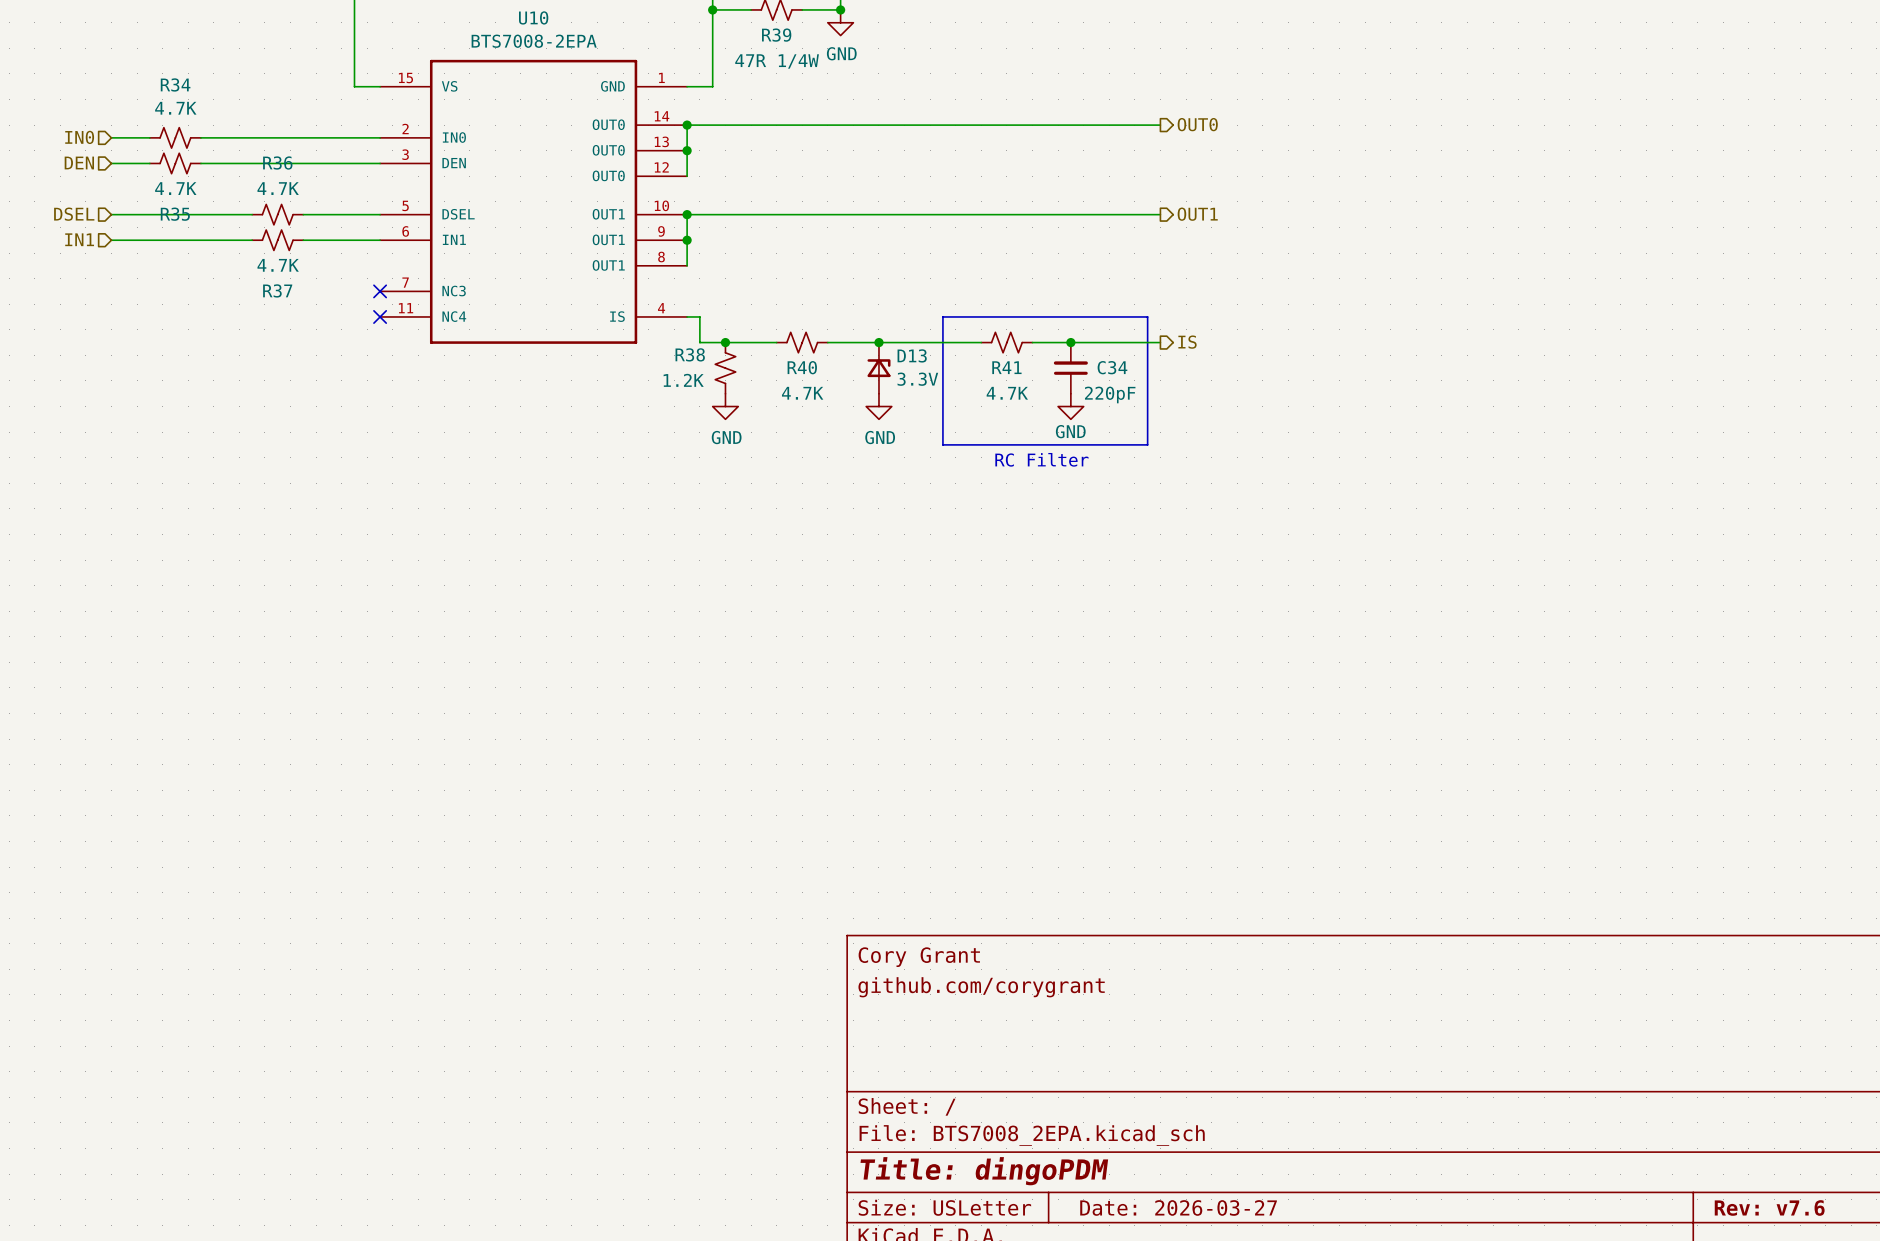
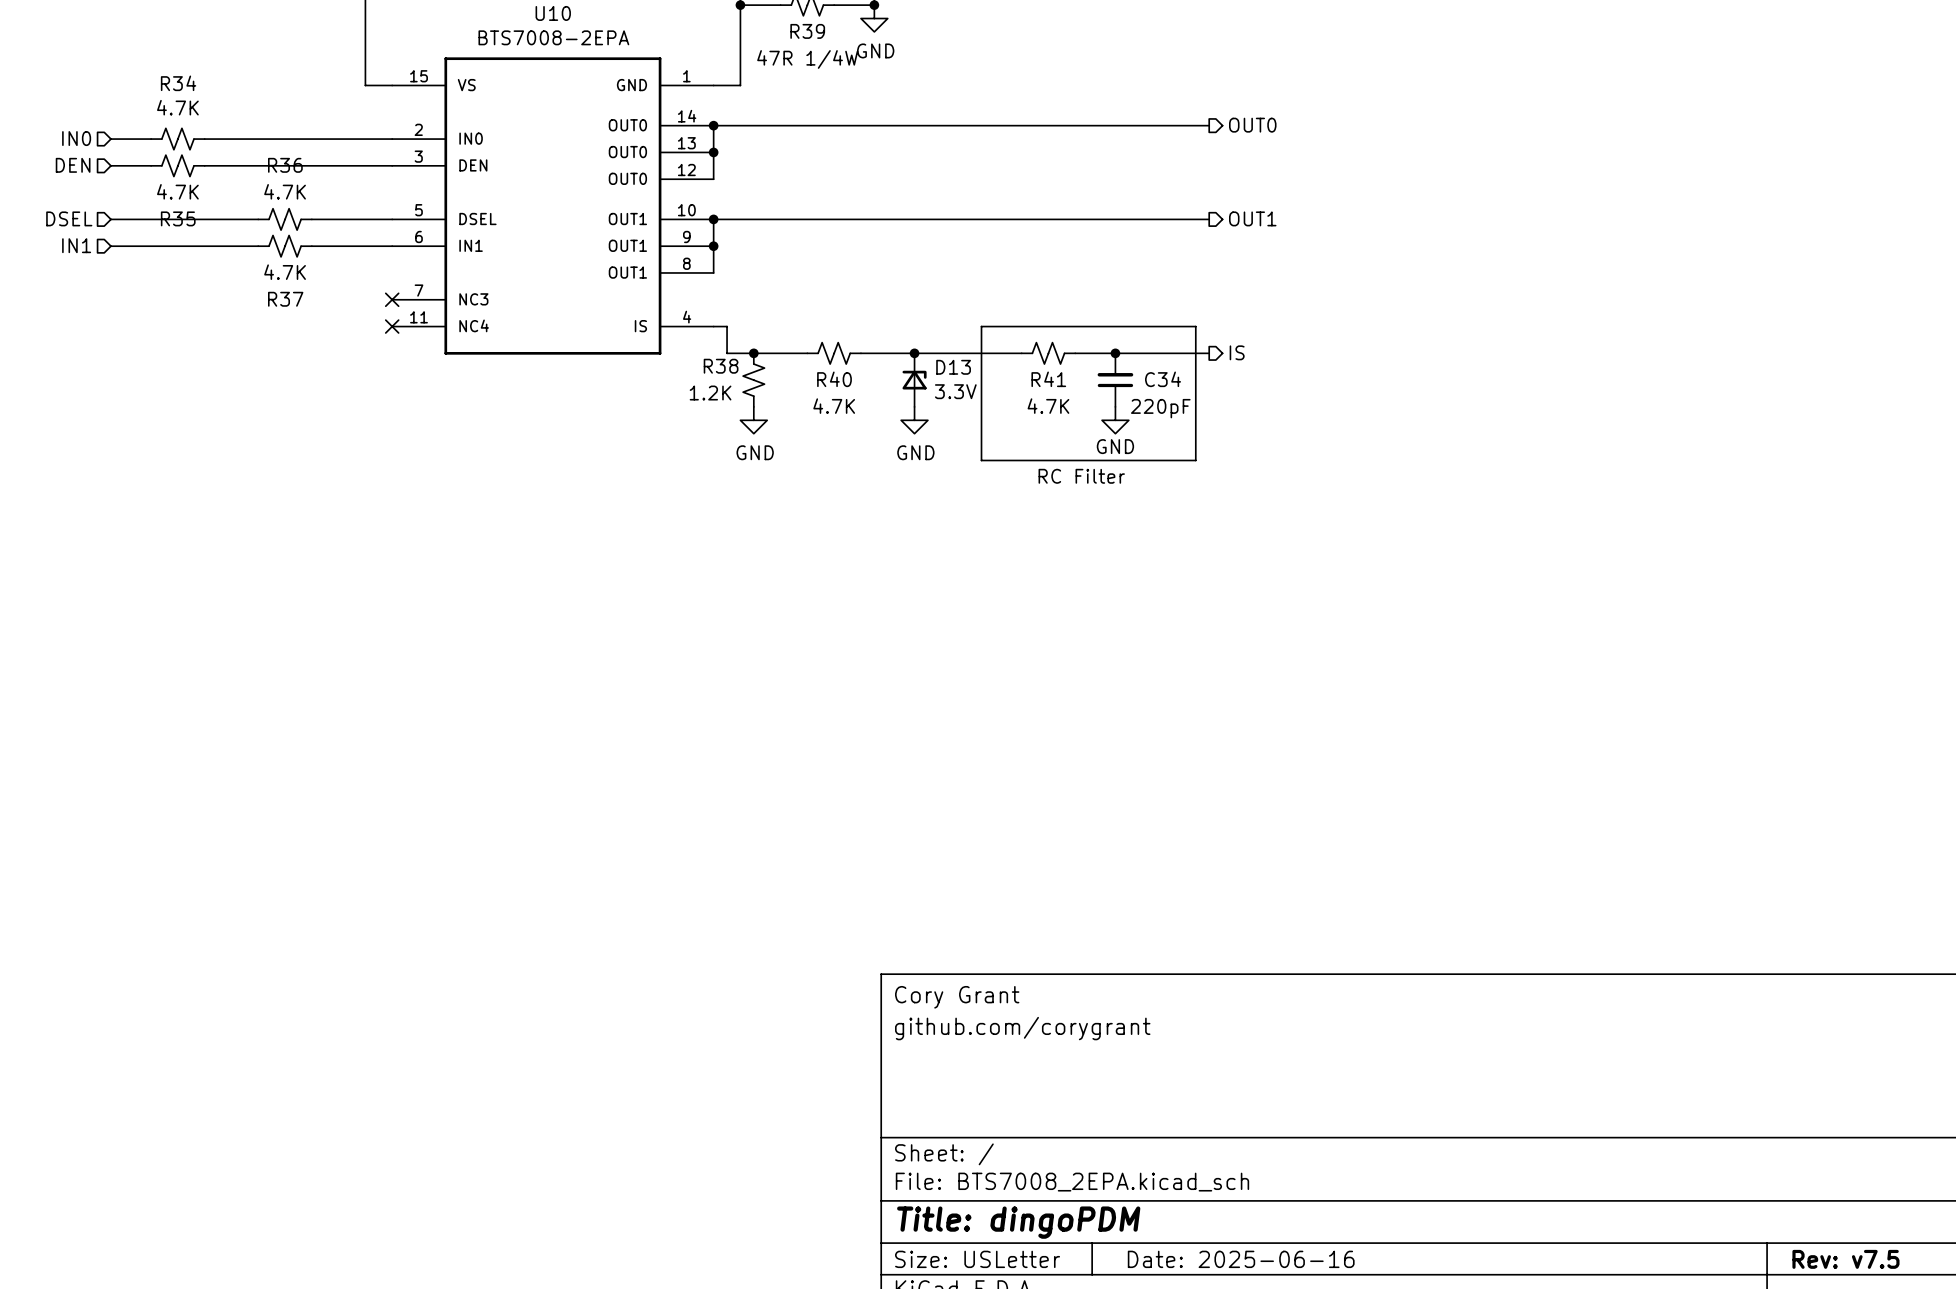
title block: Date: 2026-03-27 (1178, 1207) -> Date: 2025-06-16 (1241, 1259)
title block: Rev: v7.6 (1769, 1207) -> Rev: v7.5 (1845, 1259)

